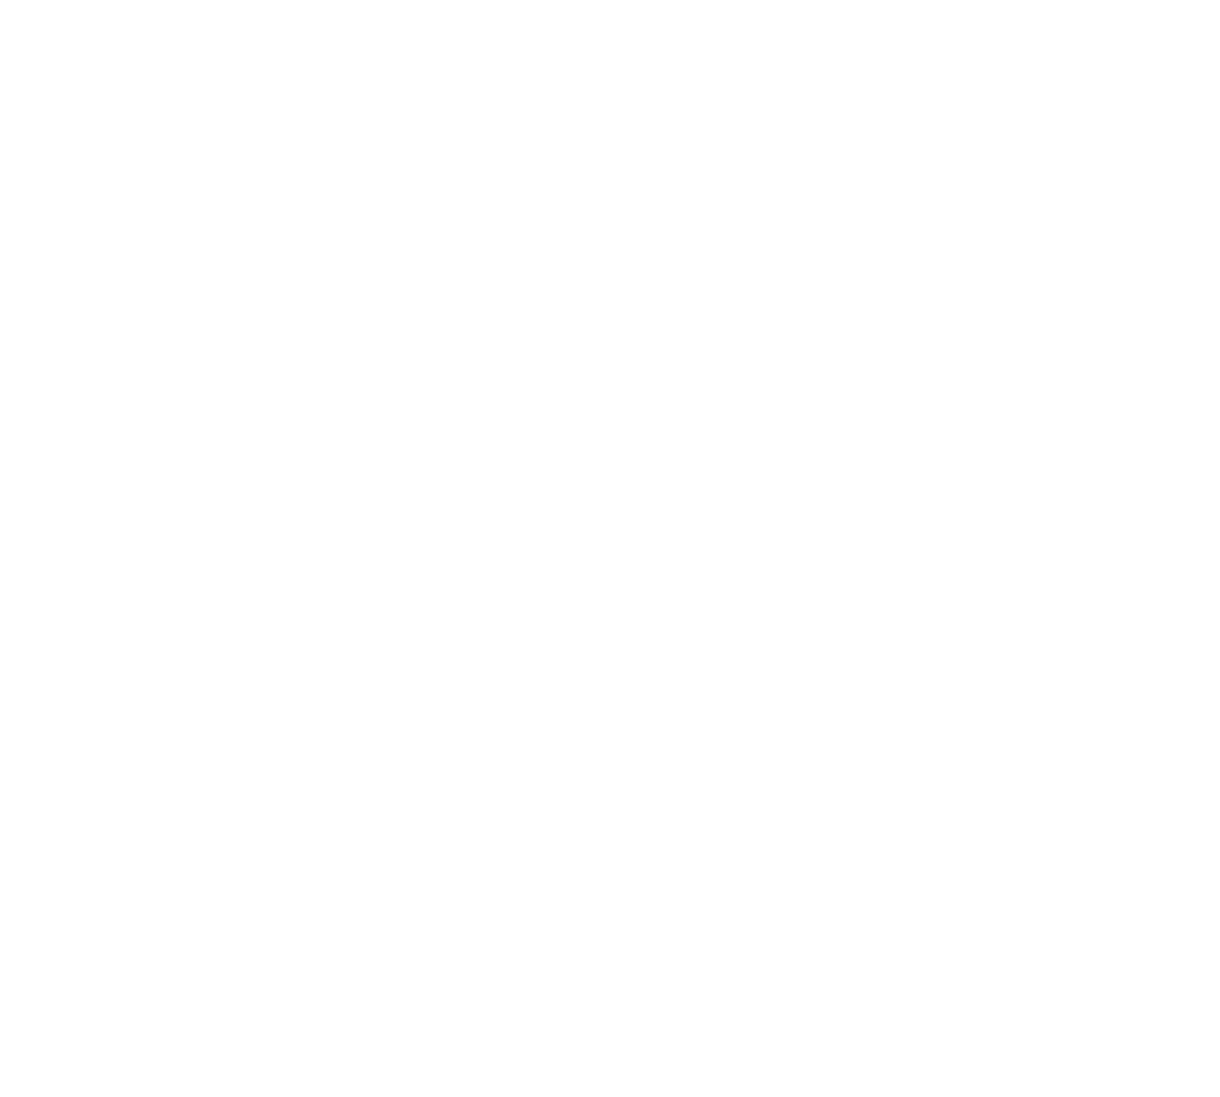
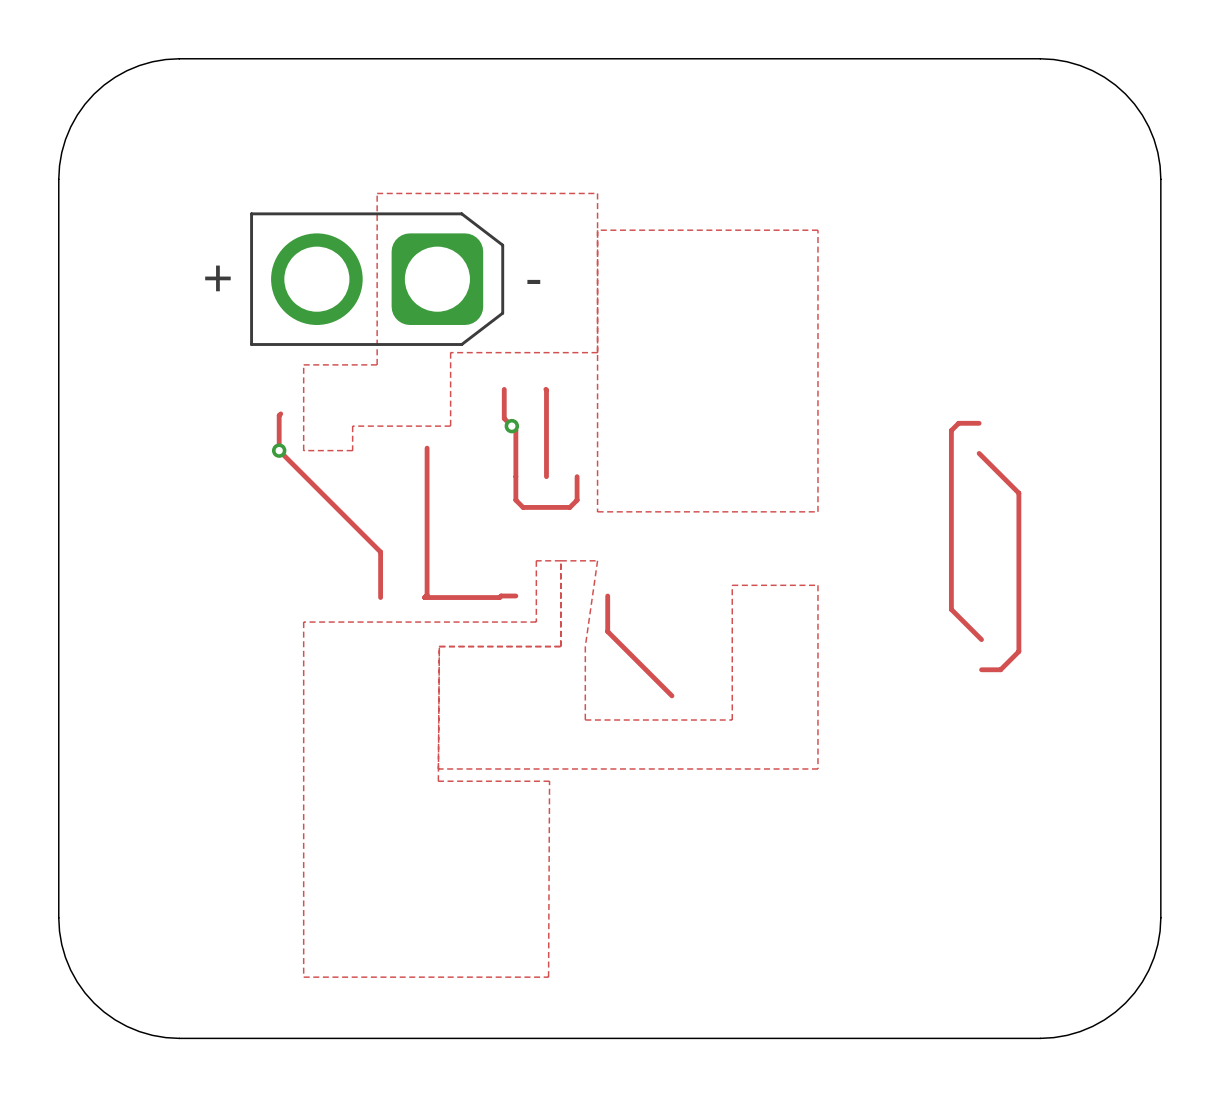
board edge: none -> (179, 58) (1040, 58) (1053, 59) (1080, 65) (1104, 77) (1125, 94) (1142, 115) (1154, 139) (1160, 165) (1160, 179) (1160, 917) (1157, 944) (1154, 957) (1142, 981) (1125, 1003) (1115, 1012) (1092, 1026) (1067, 1035) (1040, 1038) (179, 1038) (152, 1035) (139, 1031) (115, 1019) (94, 1003) (77, 981) (65, 957) (59, 931) (58, 917) (59, 165) (61, 152) (70, 127) (85, 104) (94, 94) (115, 77) (127, 70) (152, 61) (179, 58)
zone outline: none -> (597, 230) (817, 230) (817, 511) (597, 511) (597, 193) (377, 193) (377, 364) (303, 364) (303, 450) (352, 450) (352, 426) (450, 426) (450, 352) (597, 352)
part: none -> (377, 279)
track: none -> (504, 389) (504, 418) (515, 430) (515, 500) (523, 507) (569, 507) (577, 500) (577, 476)
track: none -> (545, 389) (546, 476)
track: none -> (280, 413) (279, 415) (279, 450) (380, 552) (380, 597)
track: none -> (979, 423) (958, 423) (951, 430) (951, 609) (981, 639)
via: none -> (511, 426)
track: none -> (427, 448) (427, 595) (424, 597) (515, 595)
via: none -> (279, 450)
track: none -> (979, 453) (1018, 493) (1018, 651) (1000, 669) (981, 669)
zone outline: none -> (560, 560) (560, 646) (439, 646)
track: none -> (607, 595) (607, 631) (671, 695)
zone outline: none -> (439, 646) (438, 781) (549, 781) (548, 977) (303, 977) (303, 622) (536, 622) (536, 560) (597, 560) (585, 646) (585, 720) (732, 720) (732, 585) (817, 585) (817, 768) (438, 768) (439, 646)

